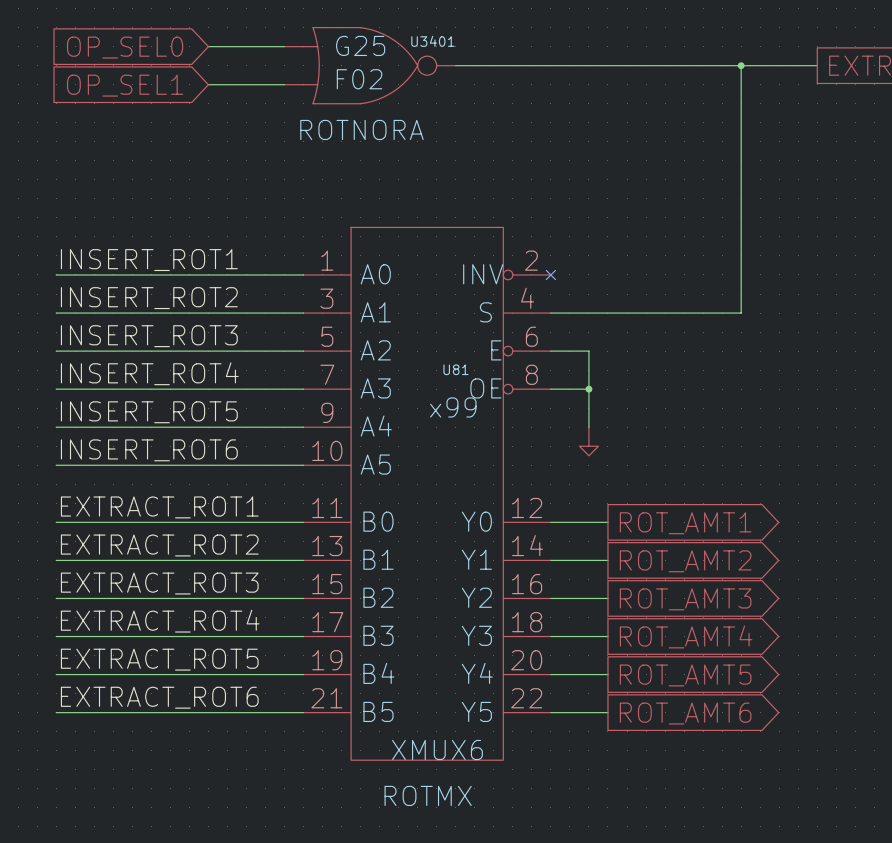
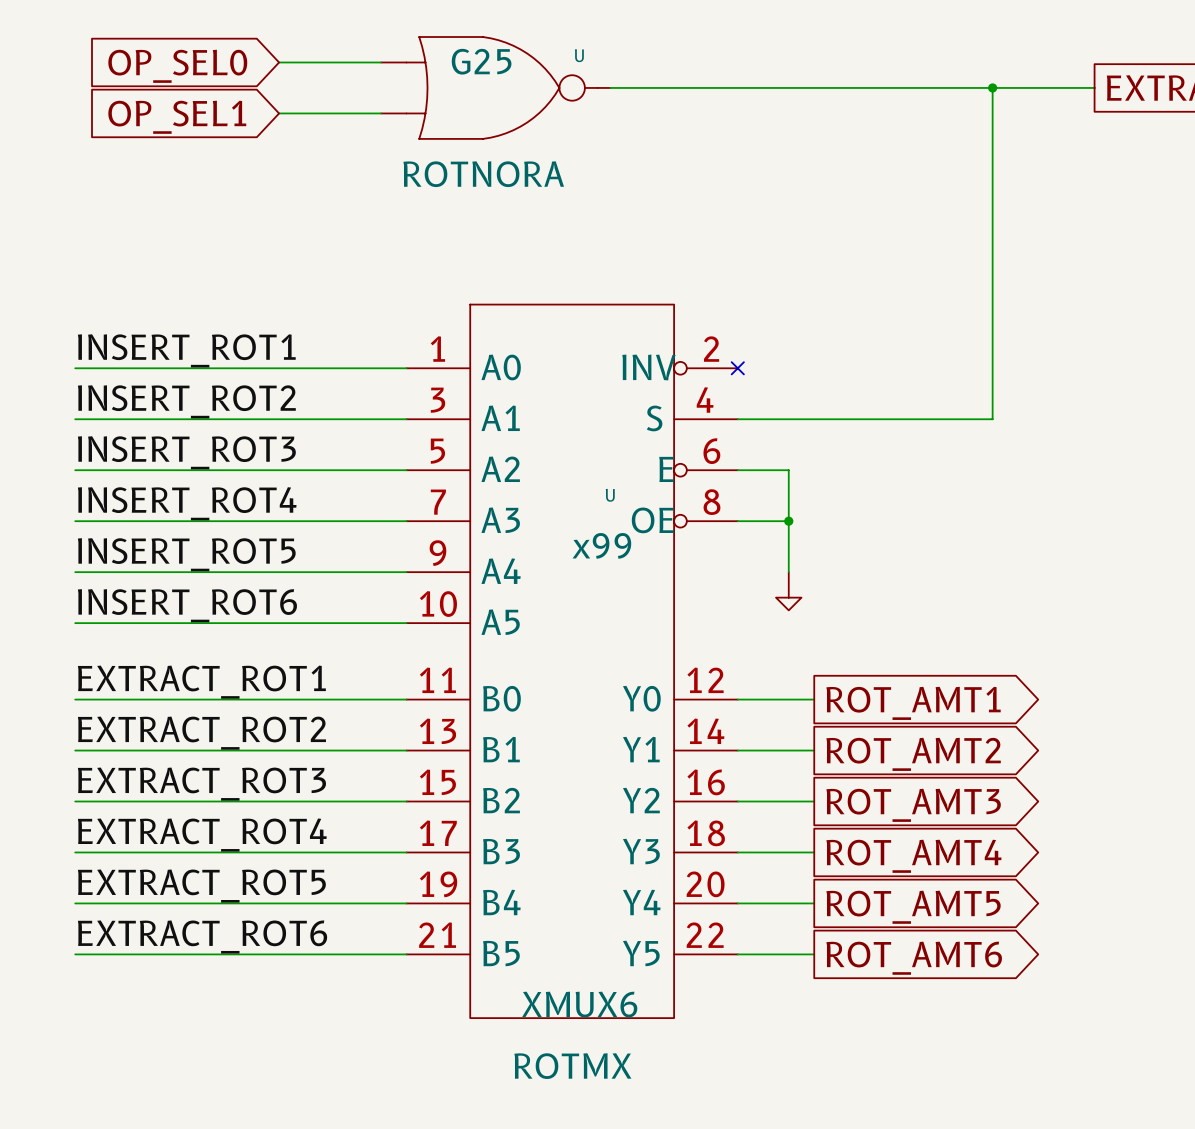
U3401 name: U3401 (432, 41) -> U (579, 55)
U3401 value: F02 (359, 79) -> none
U81 name: U81 (455, 369) -> U (610, 495)

